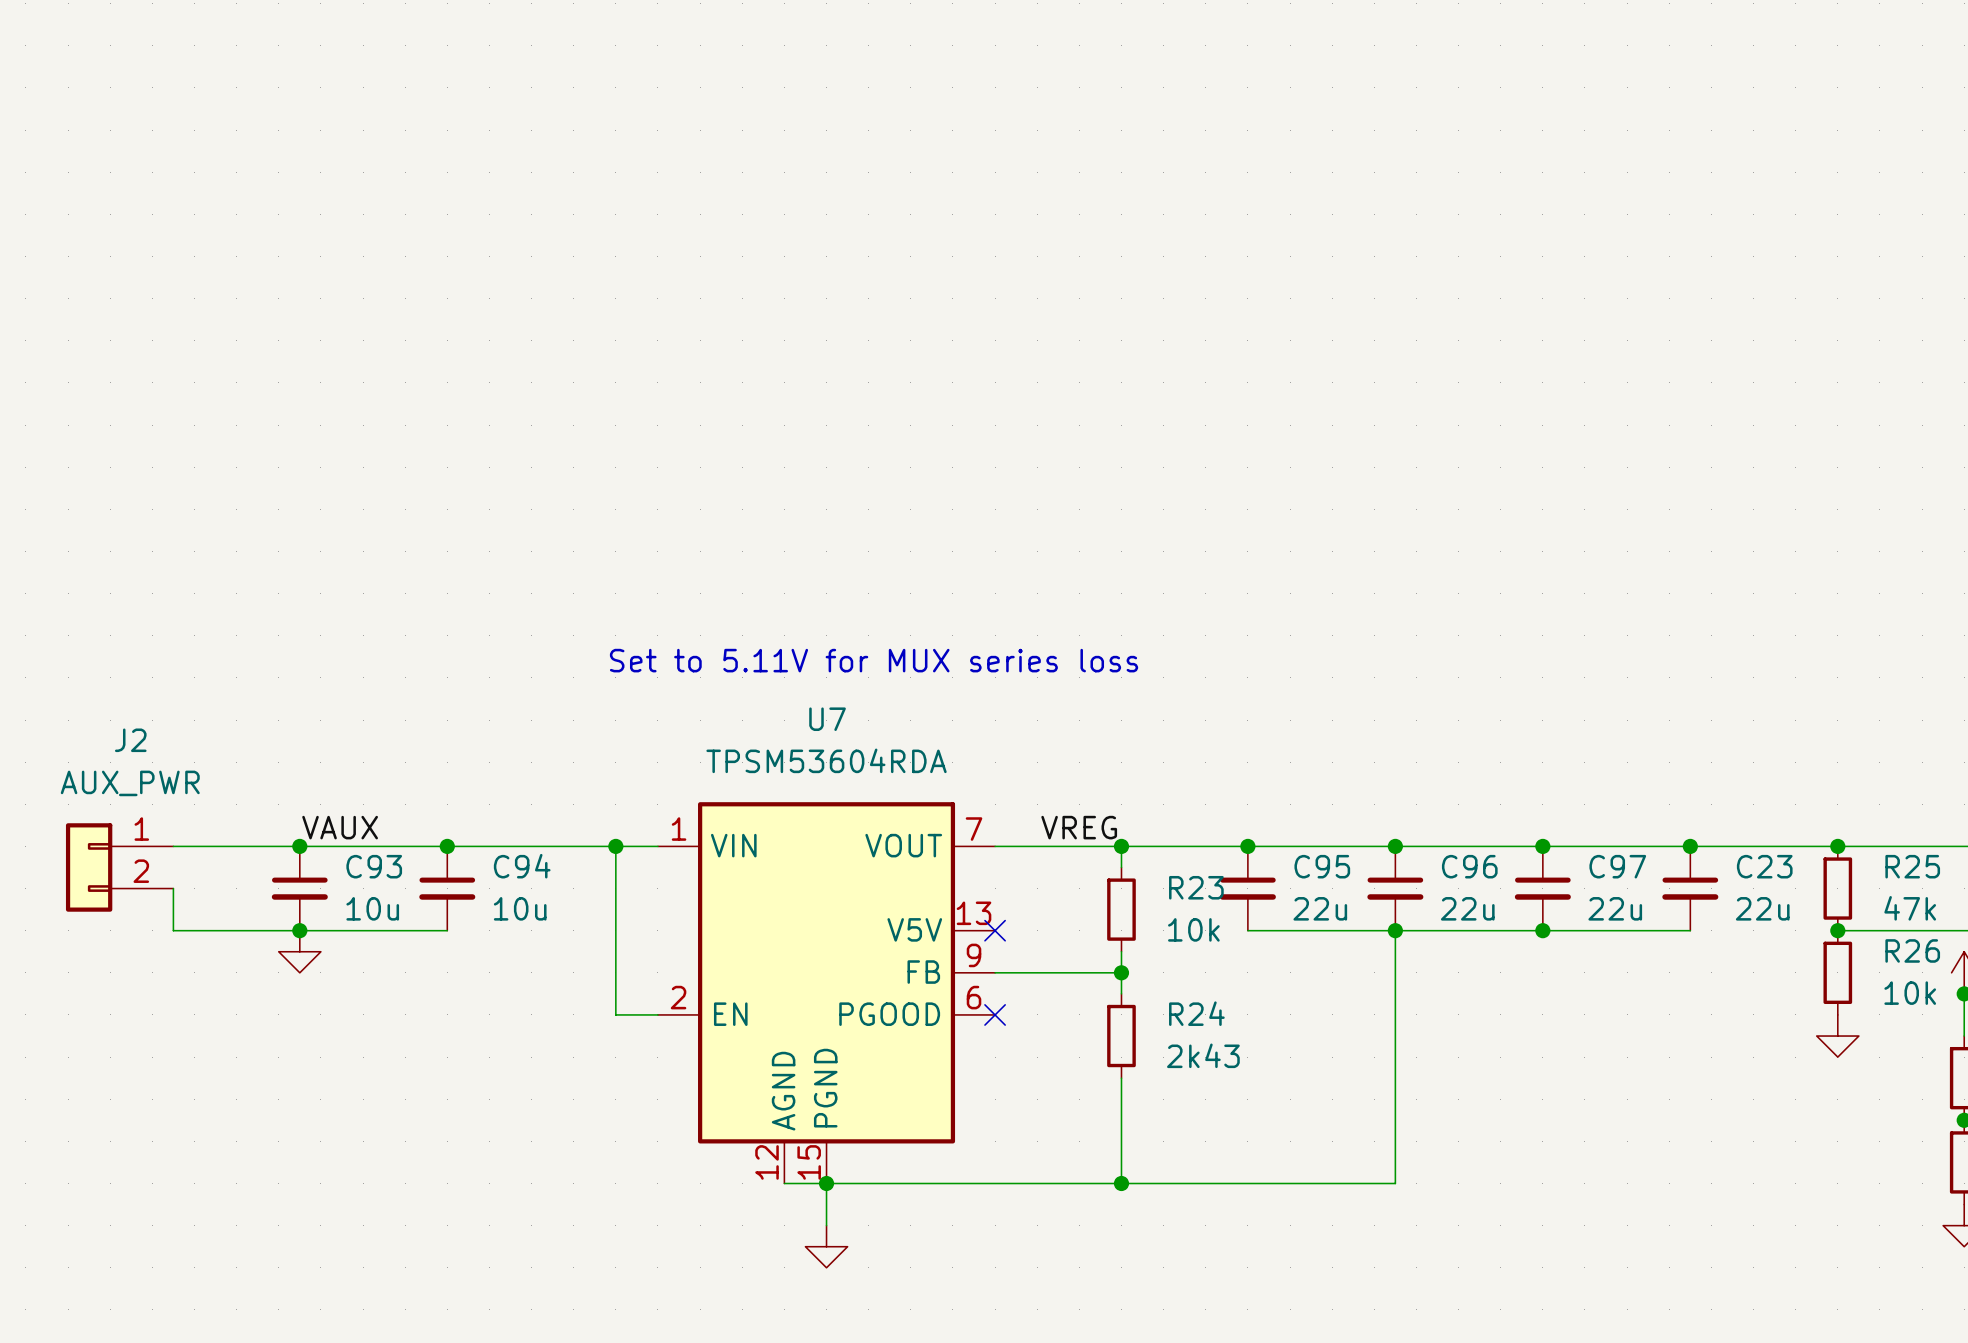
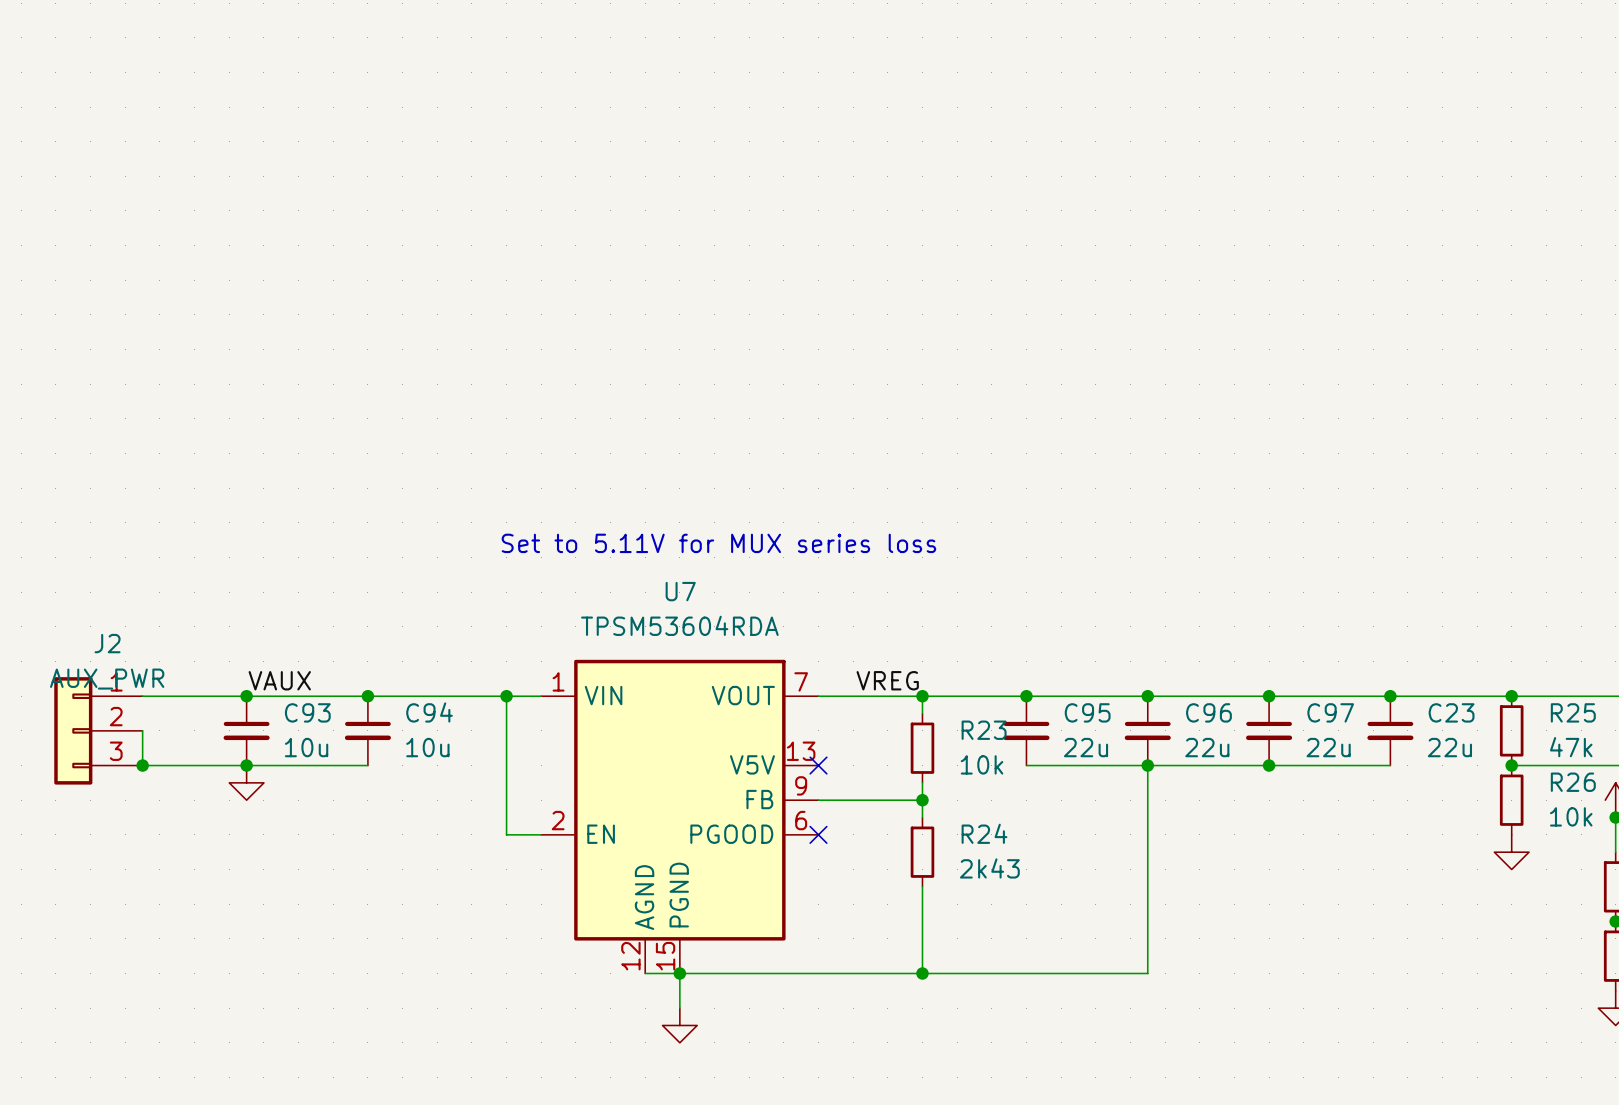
J2 symbol: [65, 823, 174, 912] -> [54, 677, 143, 785]
junction: none -> (142, 765)

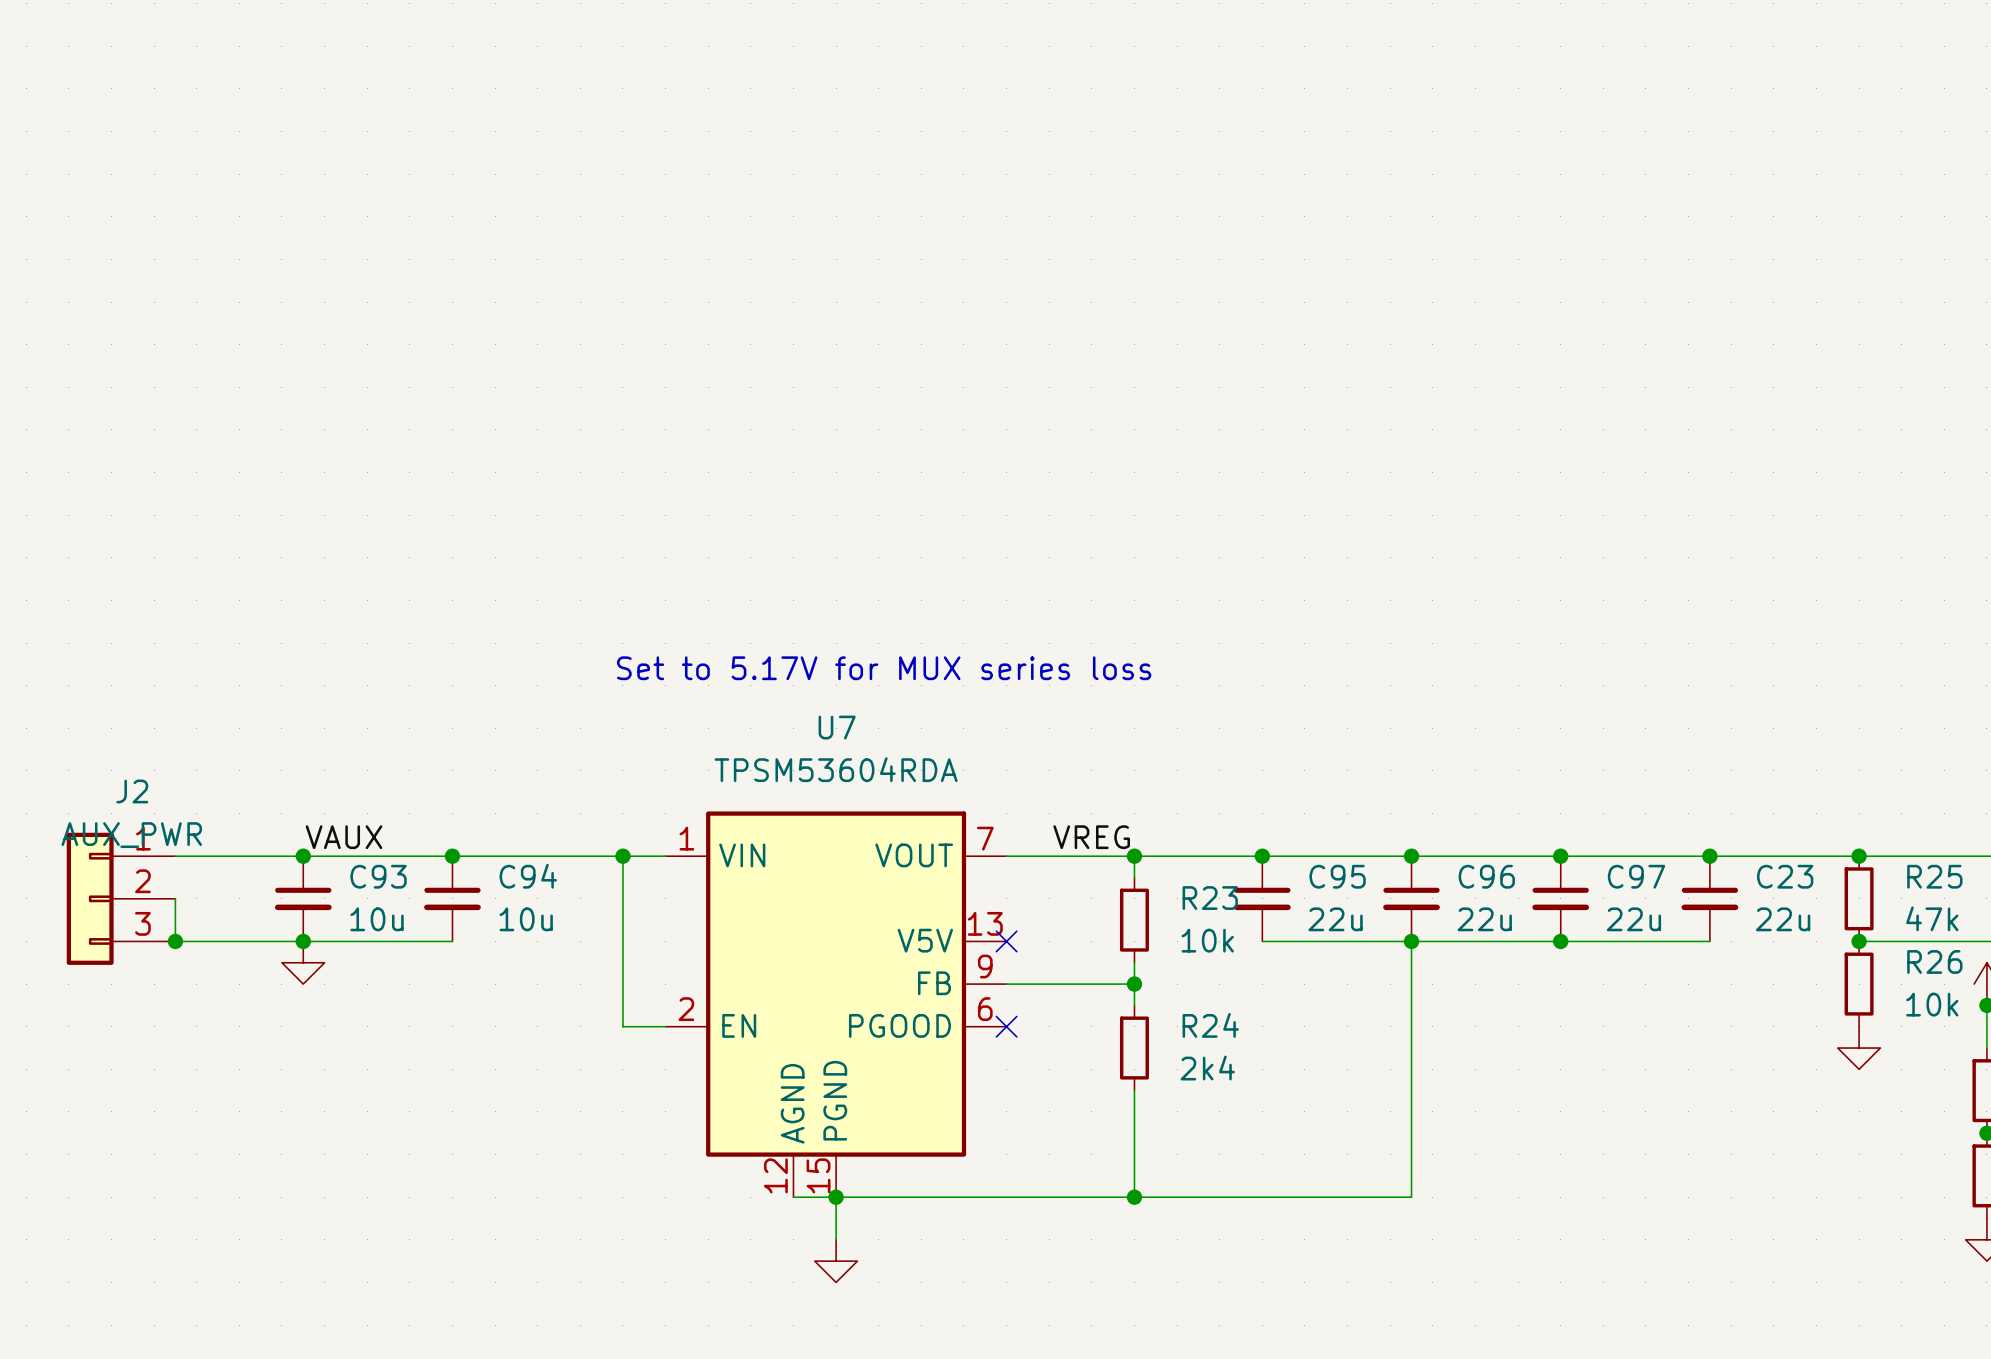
text: Set to 5.11V for MUX series loss (718, 543) -> Set to 5.17V for MUX series loss (884, 668)
R24 value: 2k43 (989, 868) -> 2k4 (1207, 1068)

